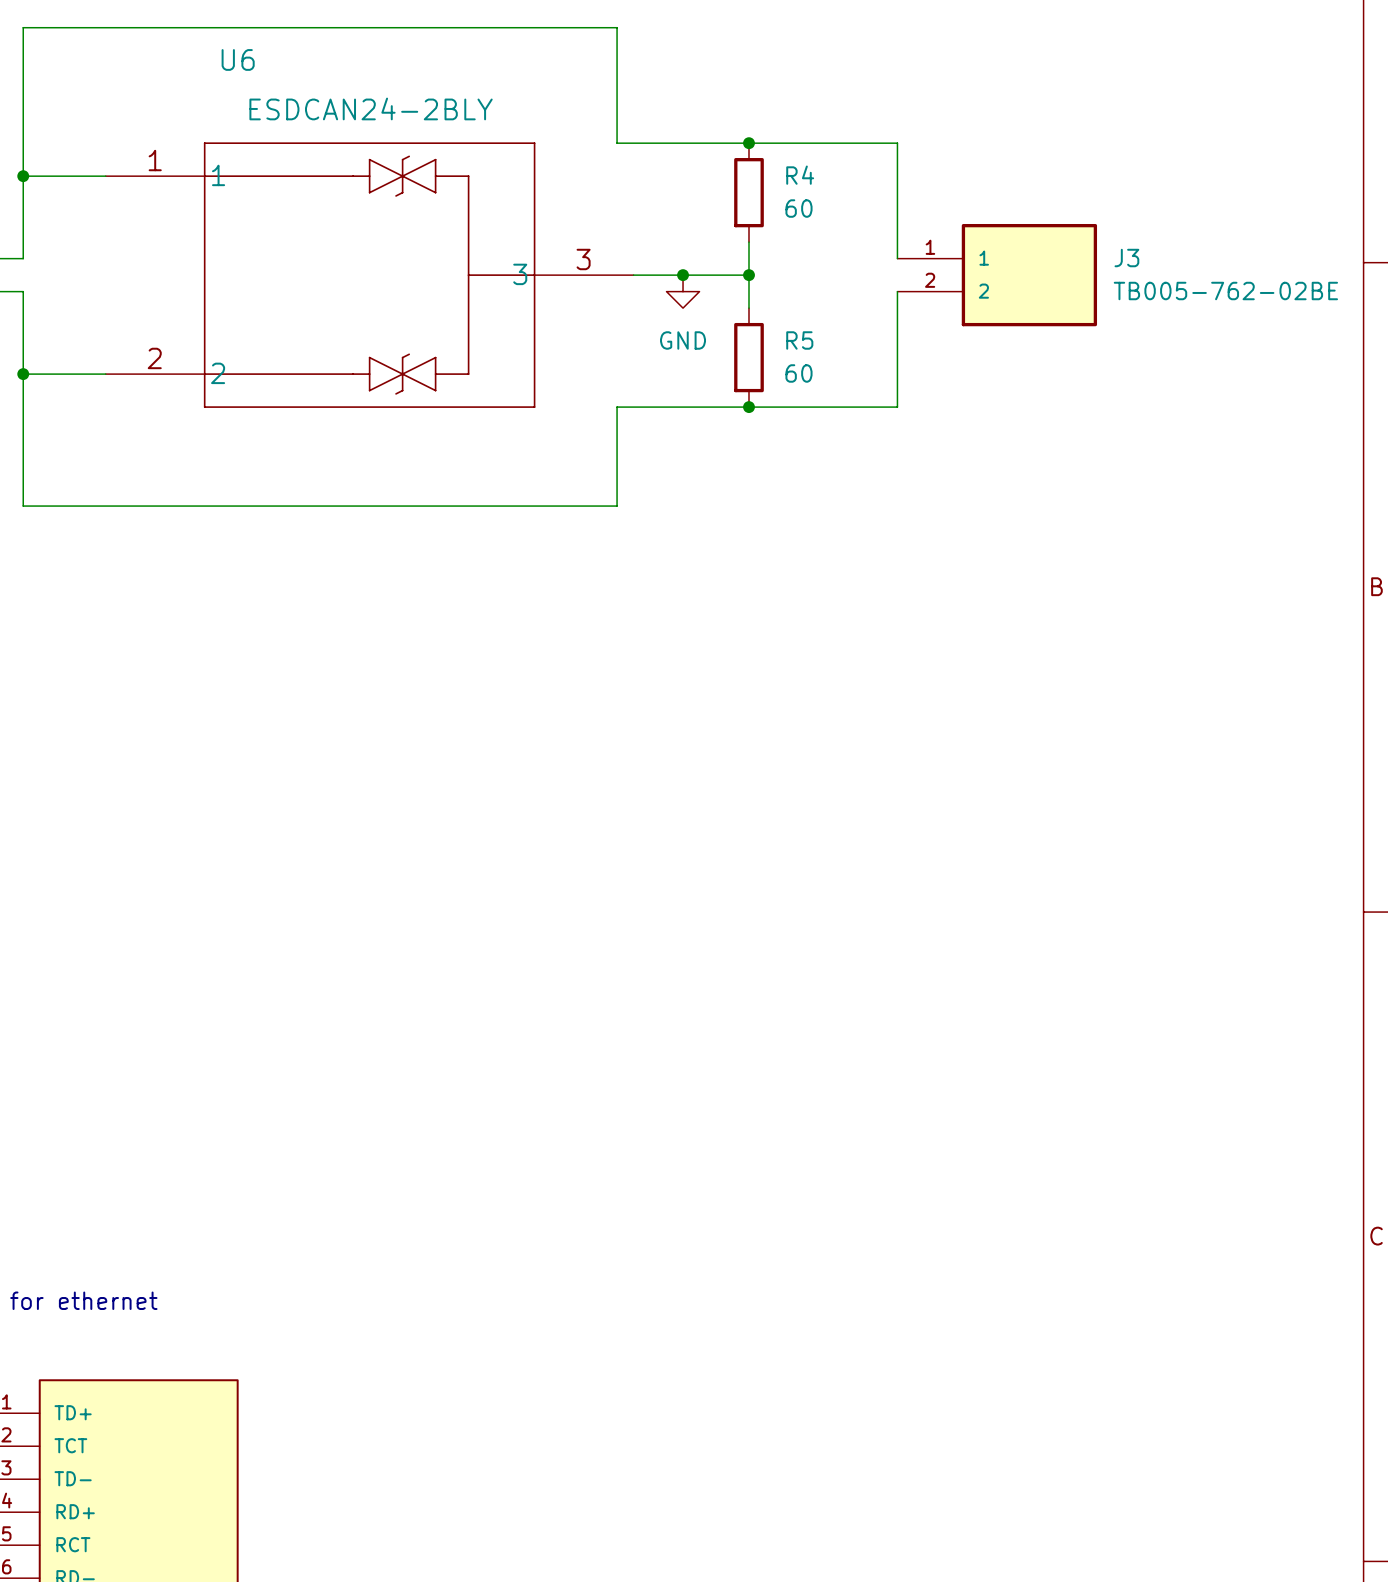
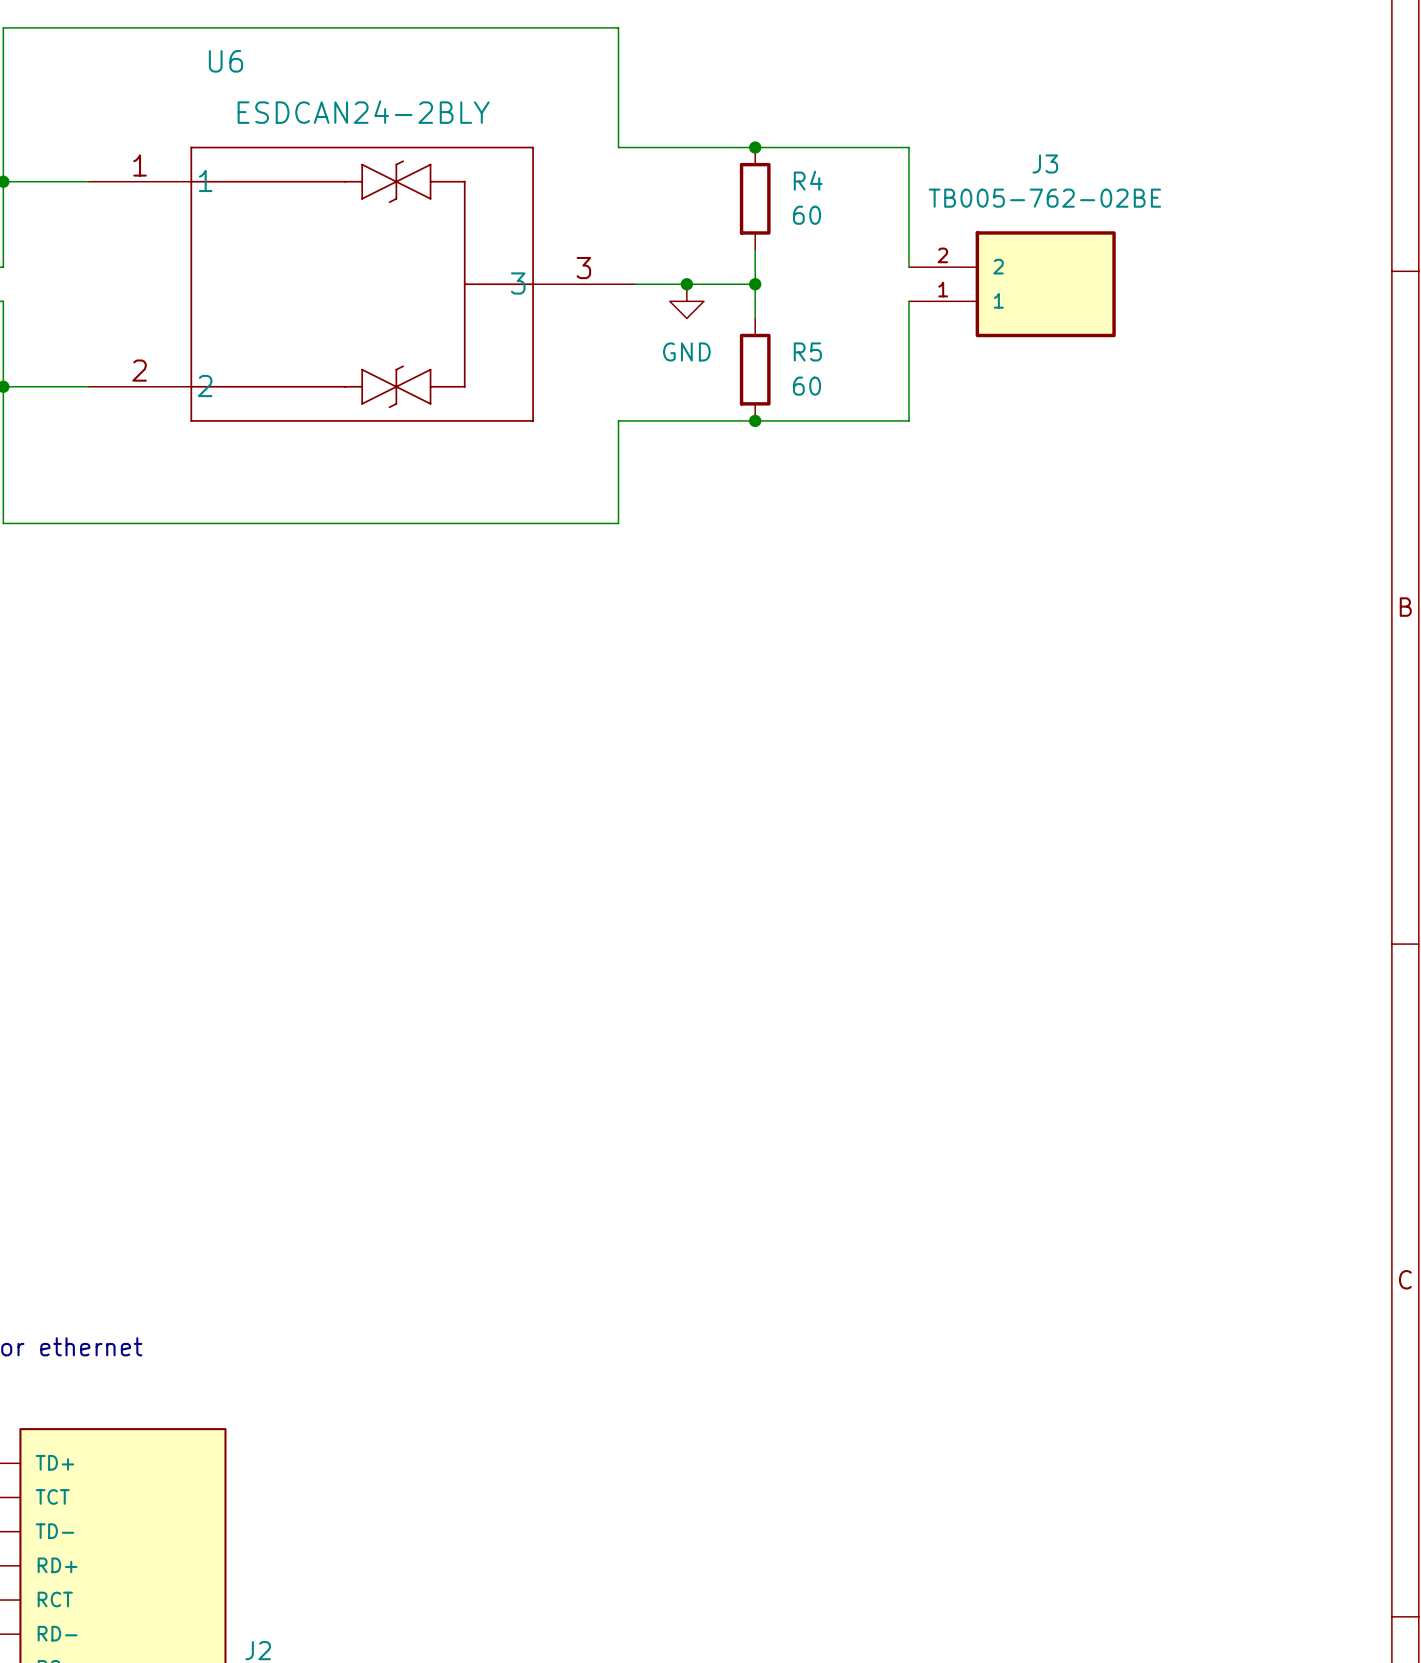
J3 name position: J3 (1126, 258) -> J3 (1045, 163)
J3 flip: as is (1029, 275) -> up-down (1045, 284)
J3 value position: TB005-762-02BE (1225, 291) -> TB005-762-02BE (1044, 198)

